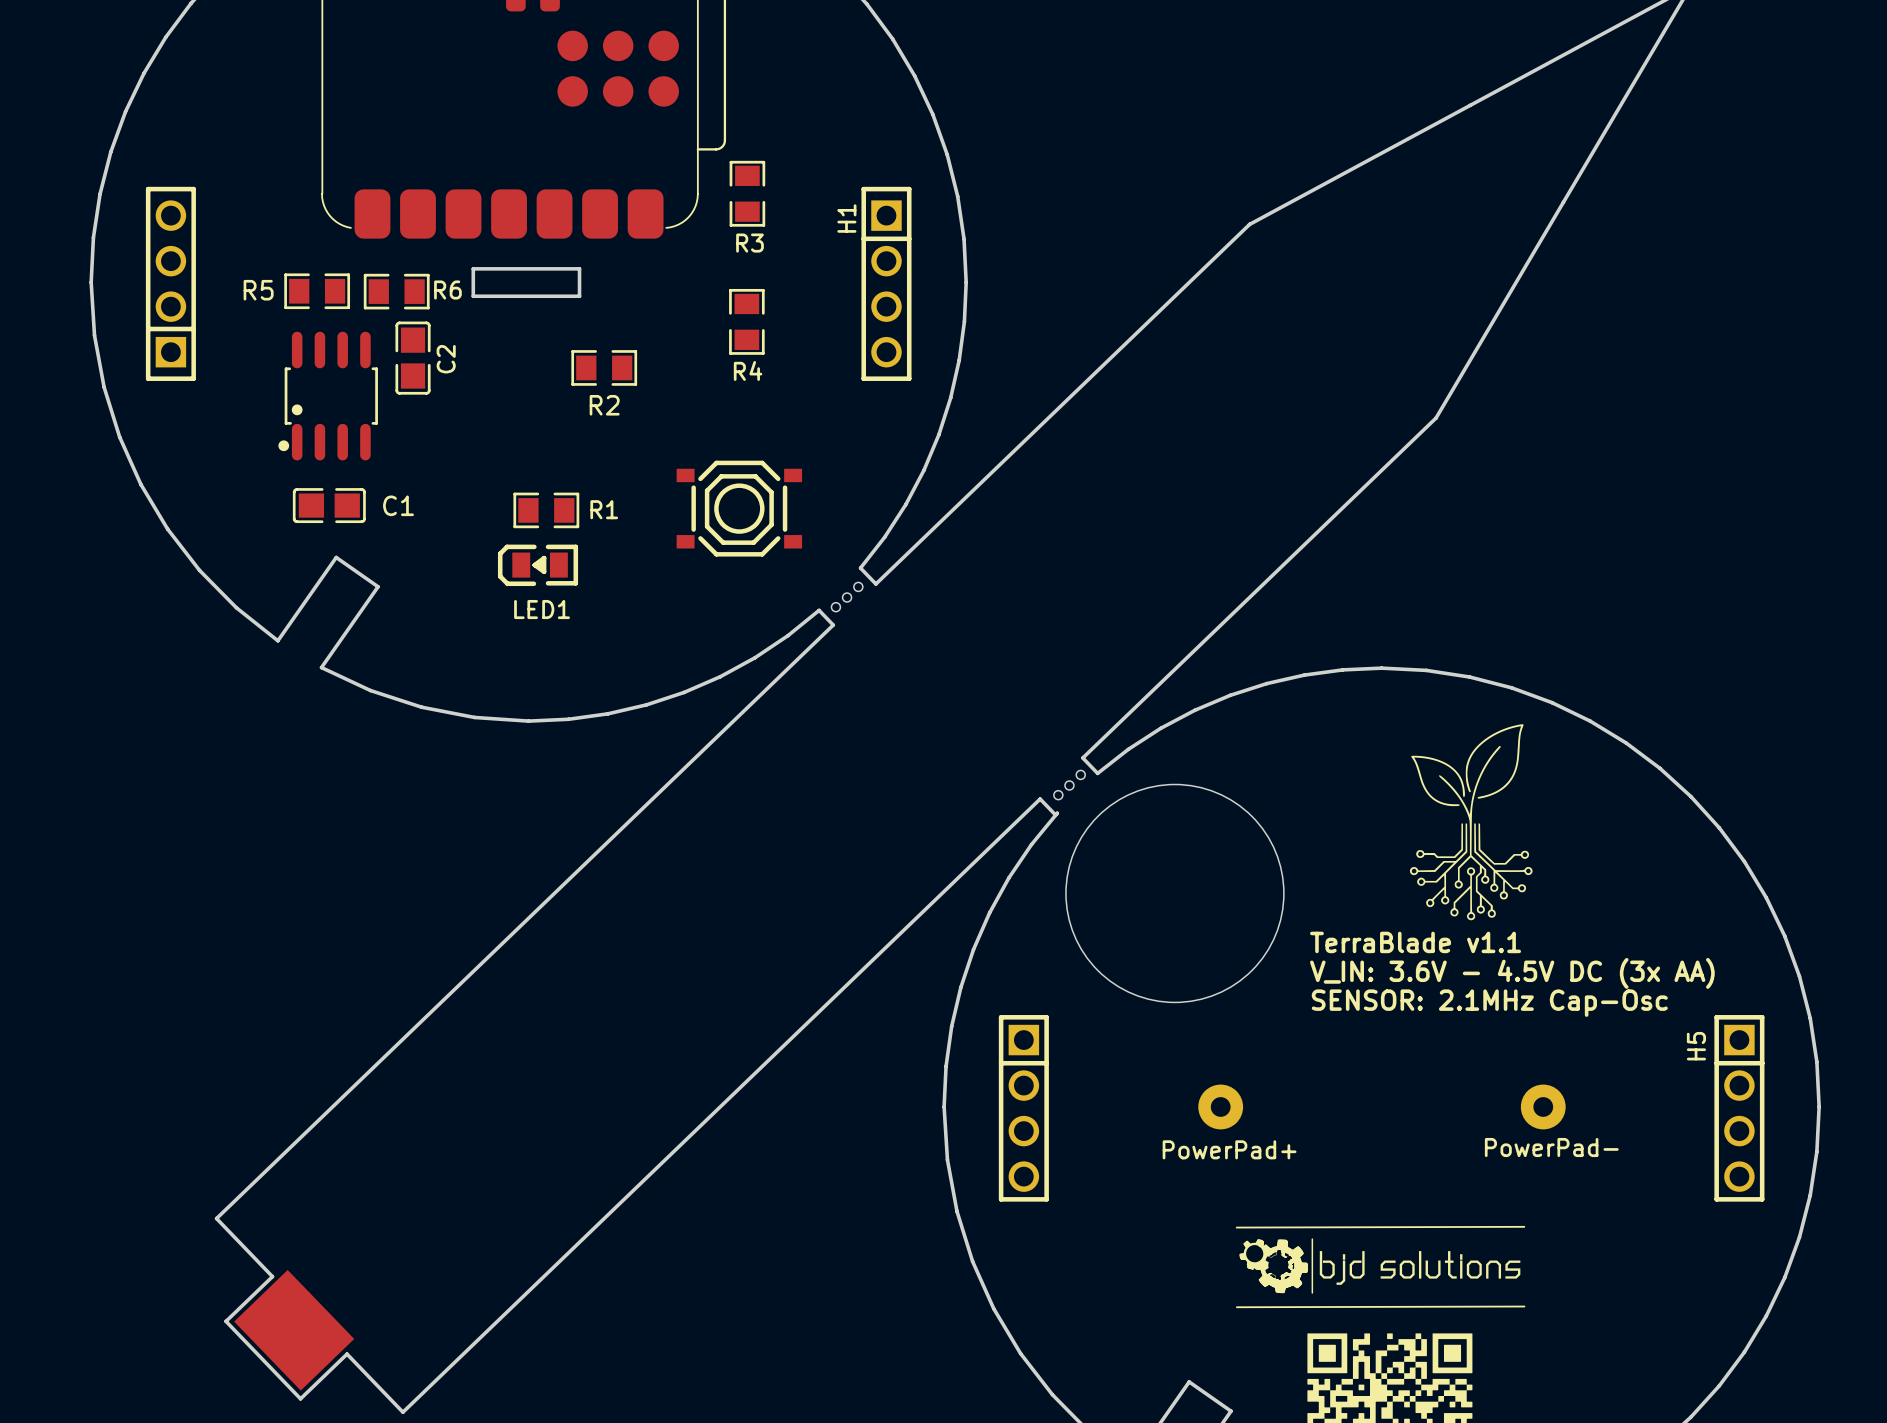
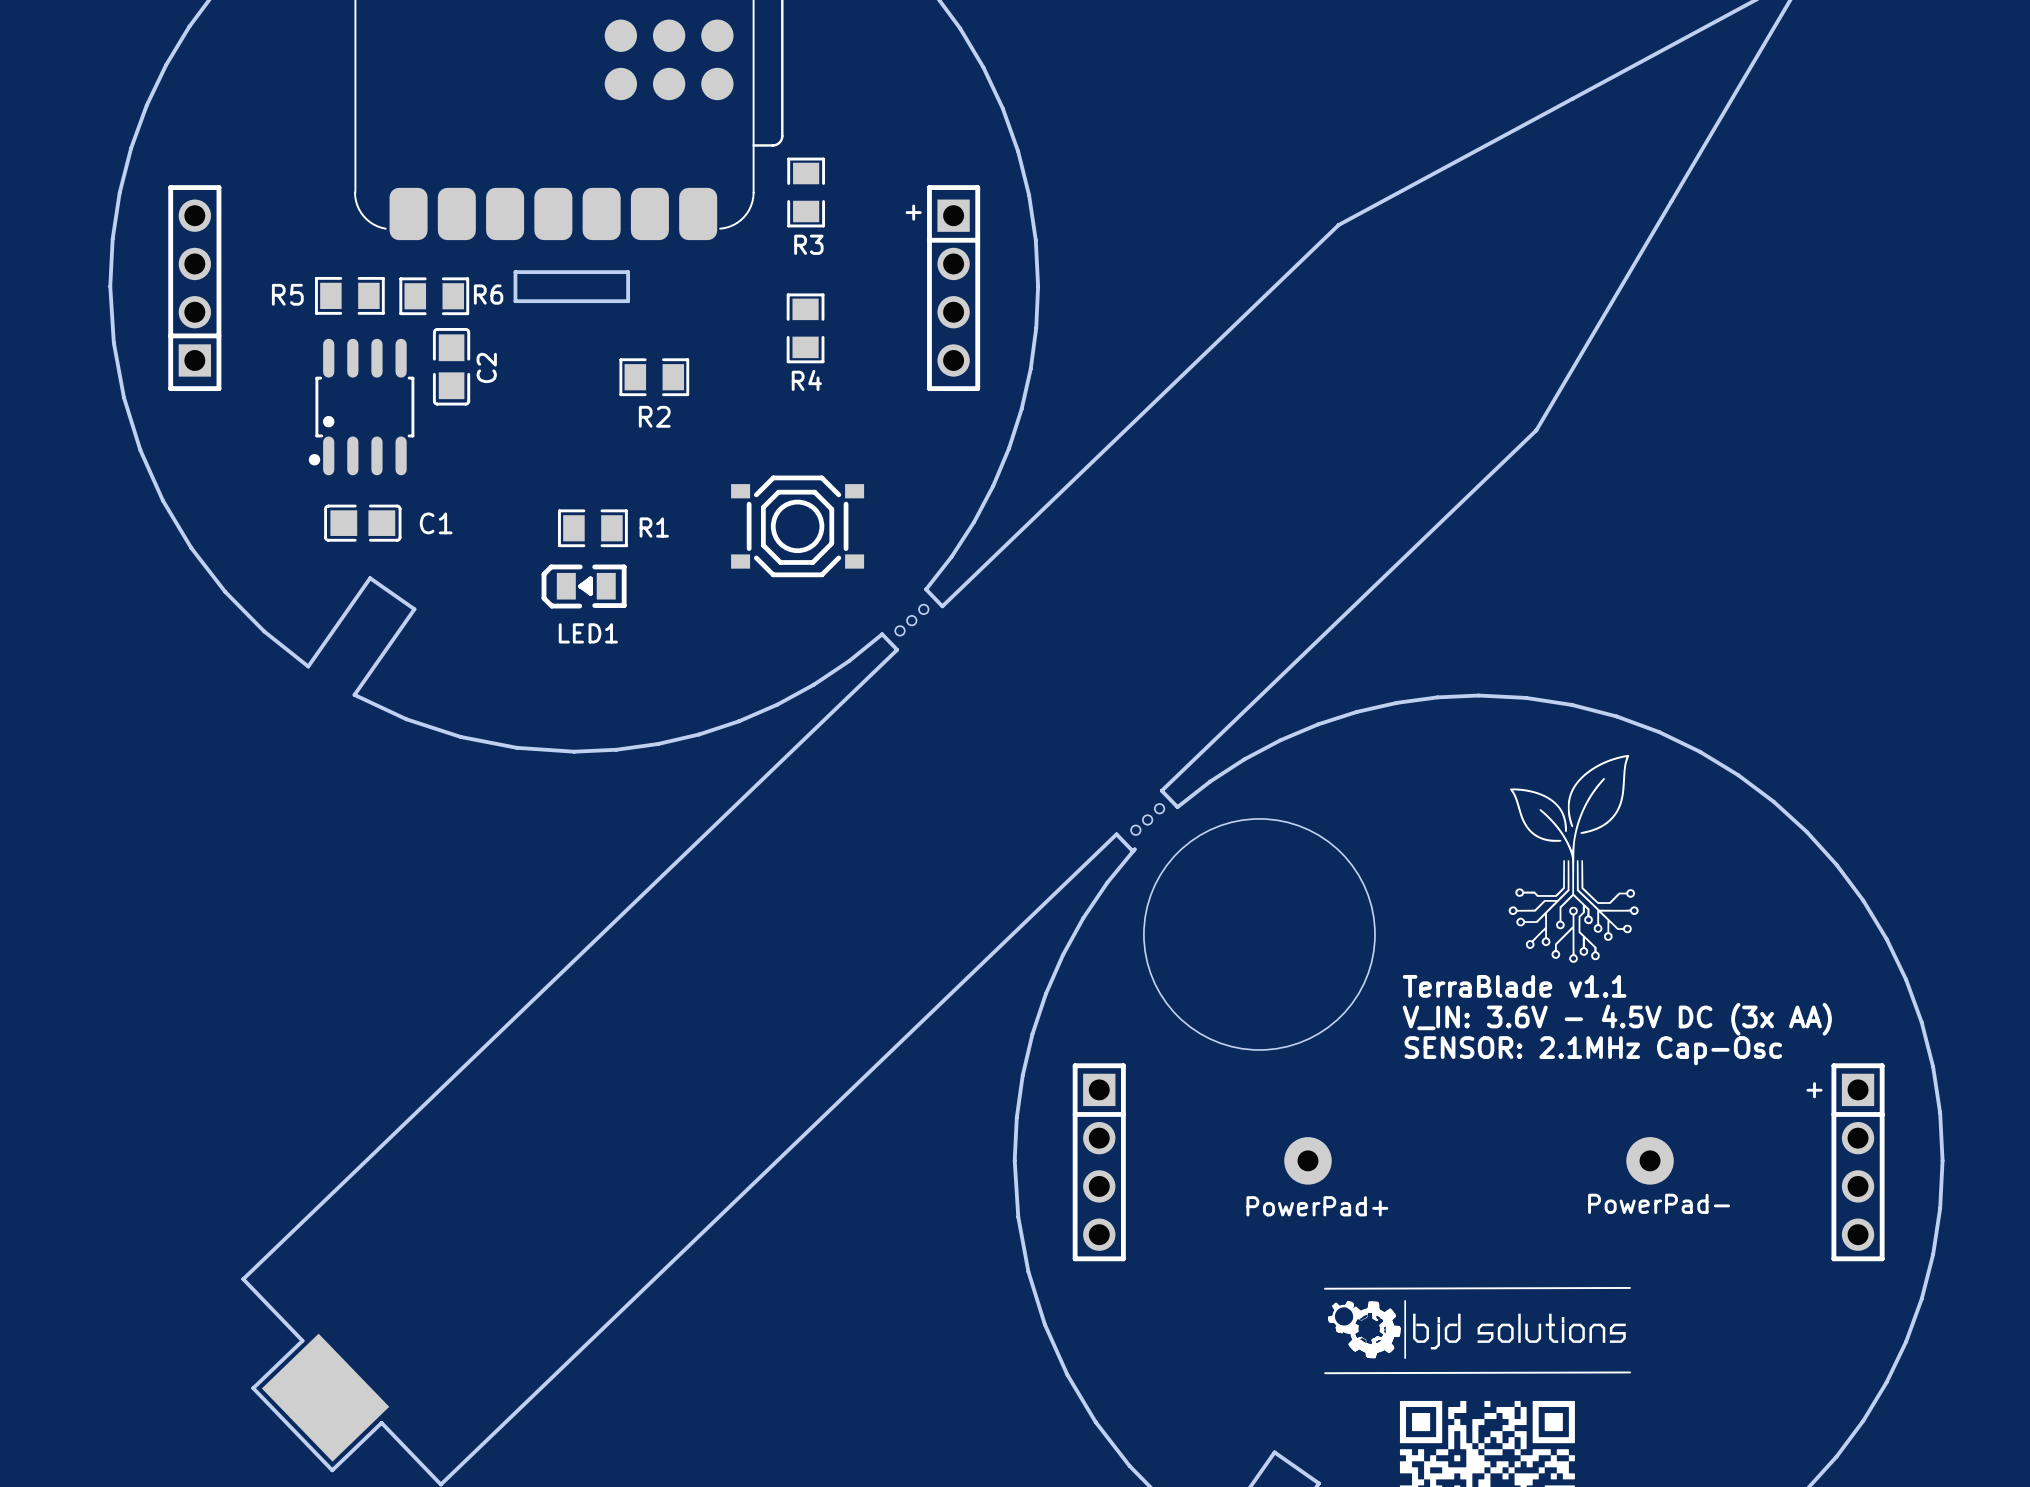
H1 name: H1 (846, 218) -> + (913, 212)
H5 name: H5 (1696, 1046) -> + (1814, 1090)

